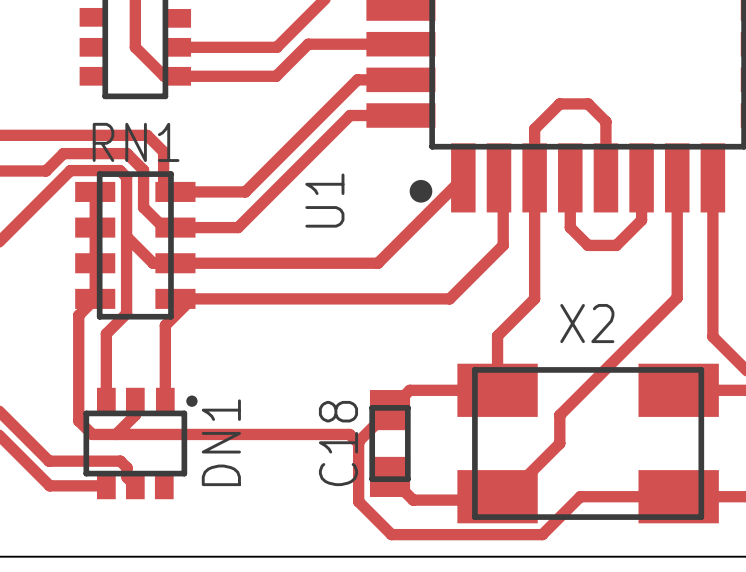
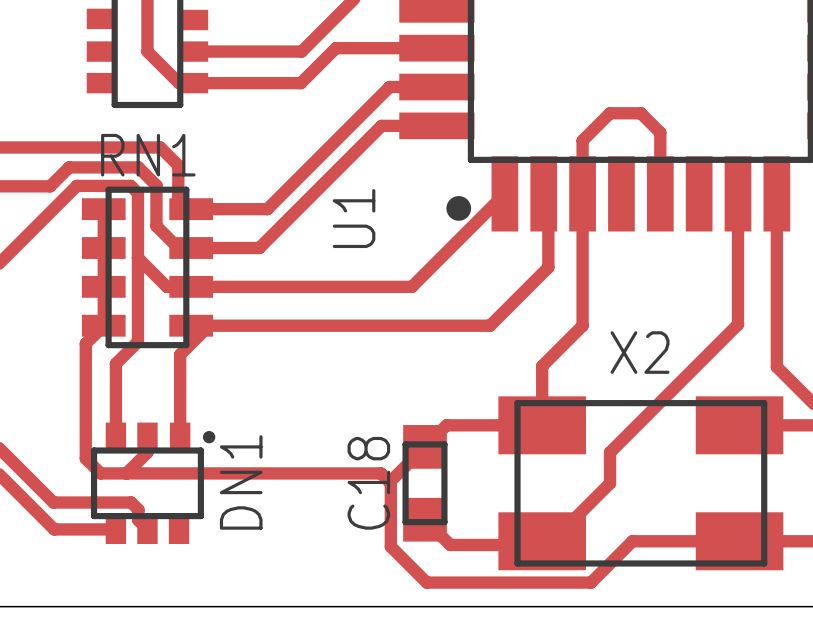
top track: (570, 177) (570, 227) (588, 245) (616, 245) (641, 220) (641, 177) -> none

